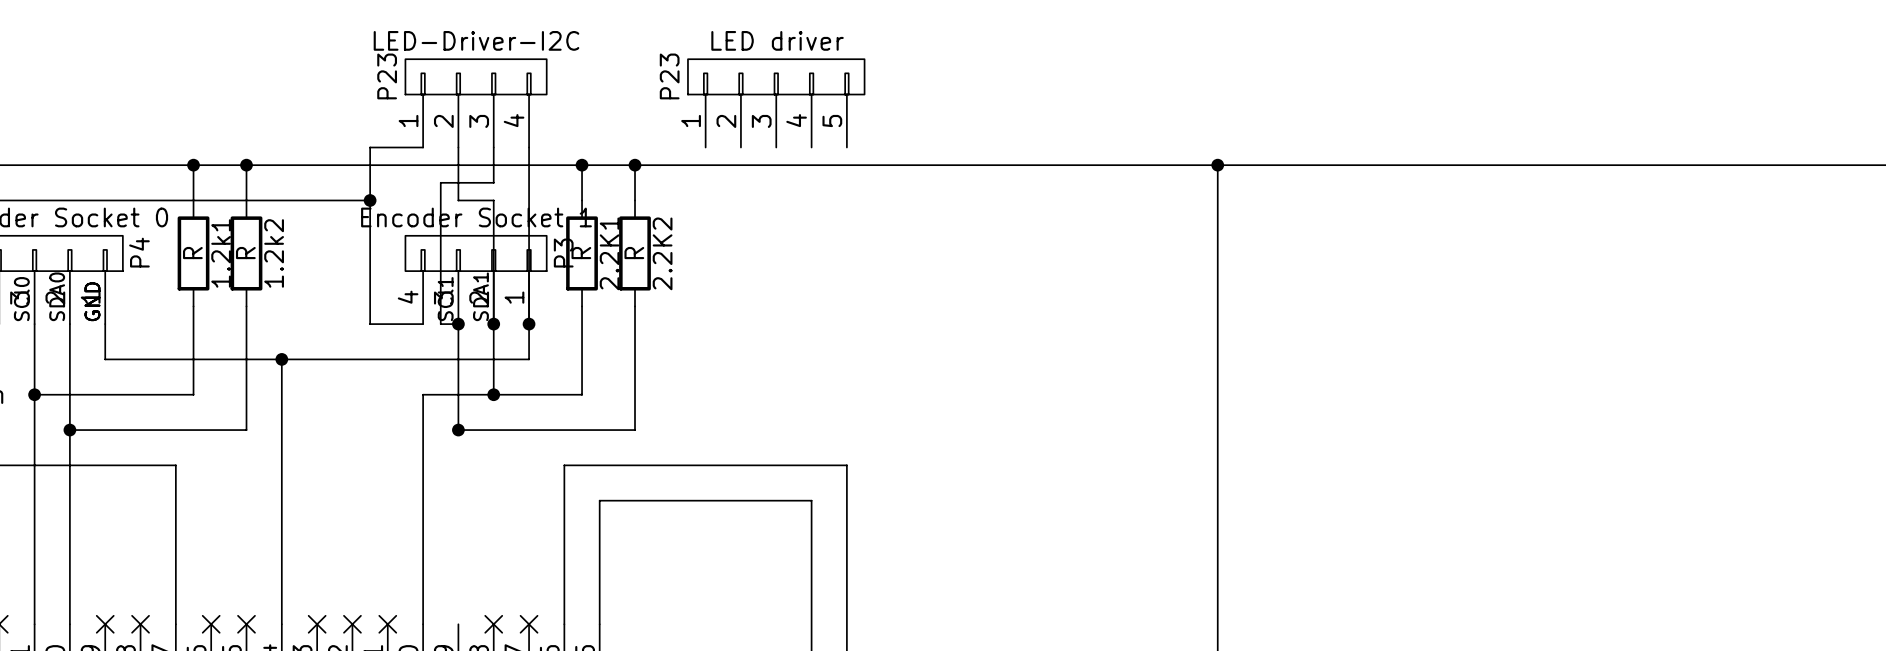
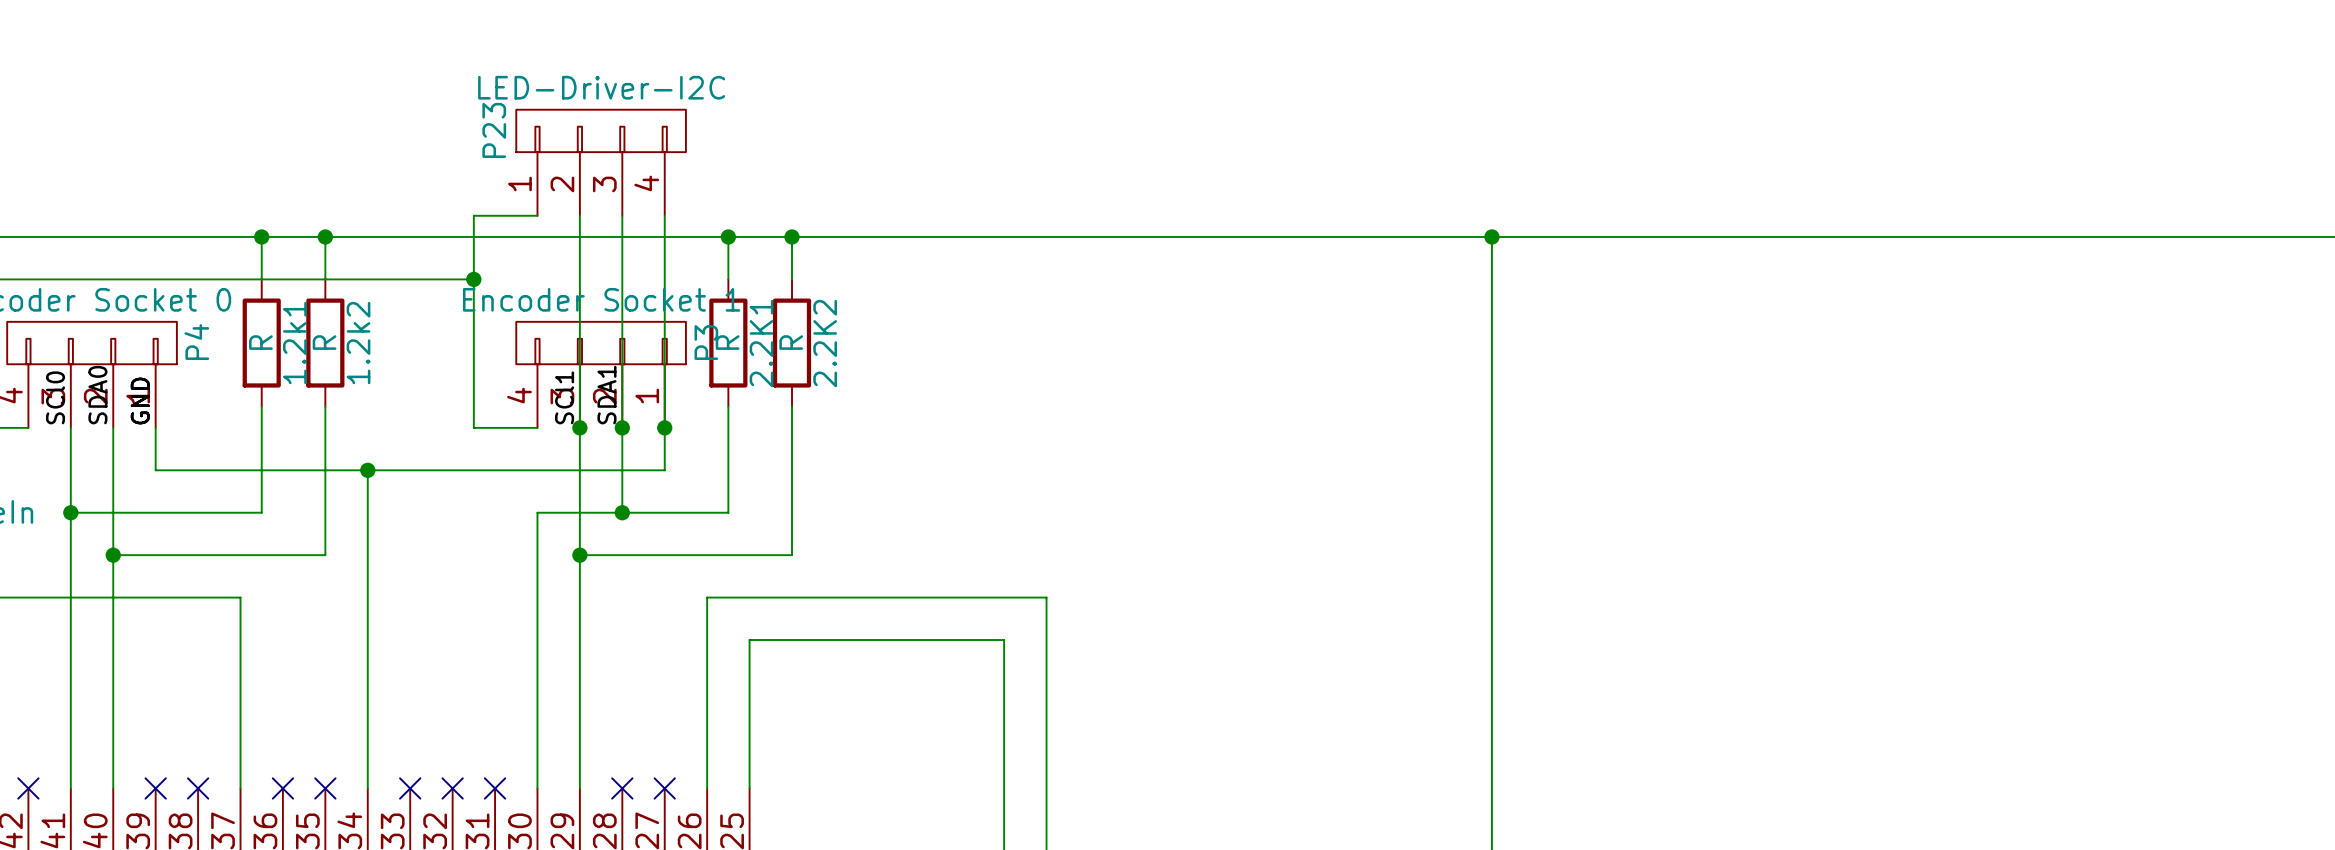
P23: LED driver (776, 103) -> none
wire: (493, 182) (440, 182) (440, 324) (458, 324) -> (579, 279) (579, 427)
wire: (458, 200) (493, 200) -> (622, 258) (622, 279)
wire: none -> (579, 555) (579, 788)

